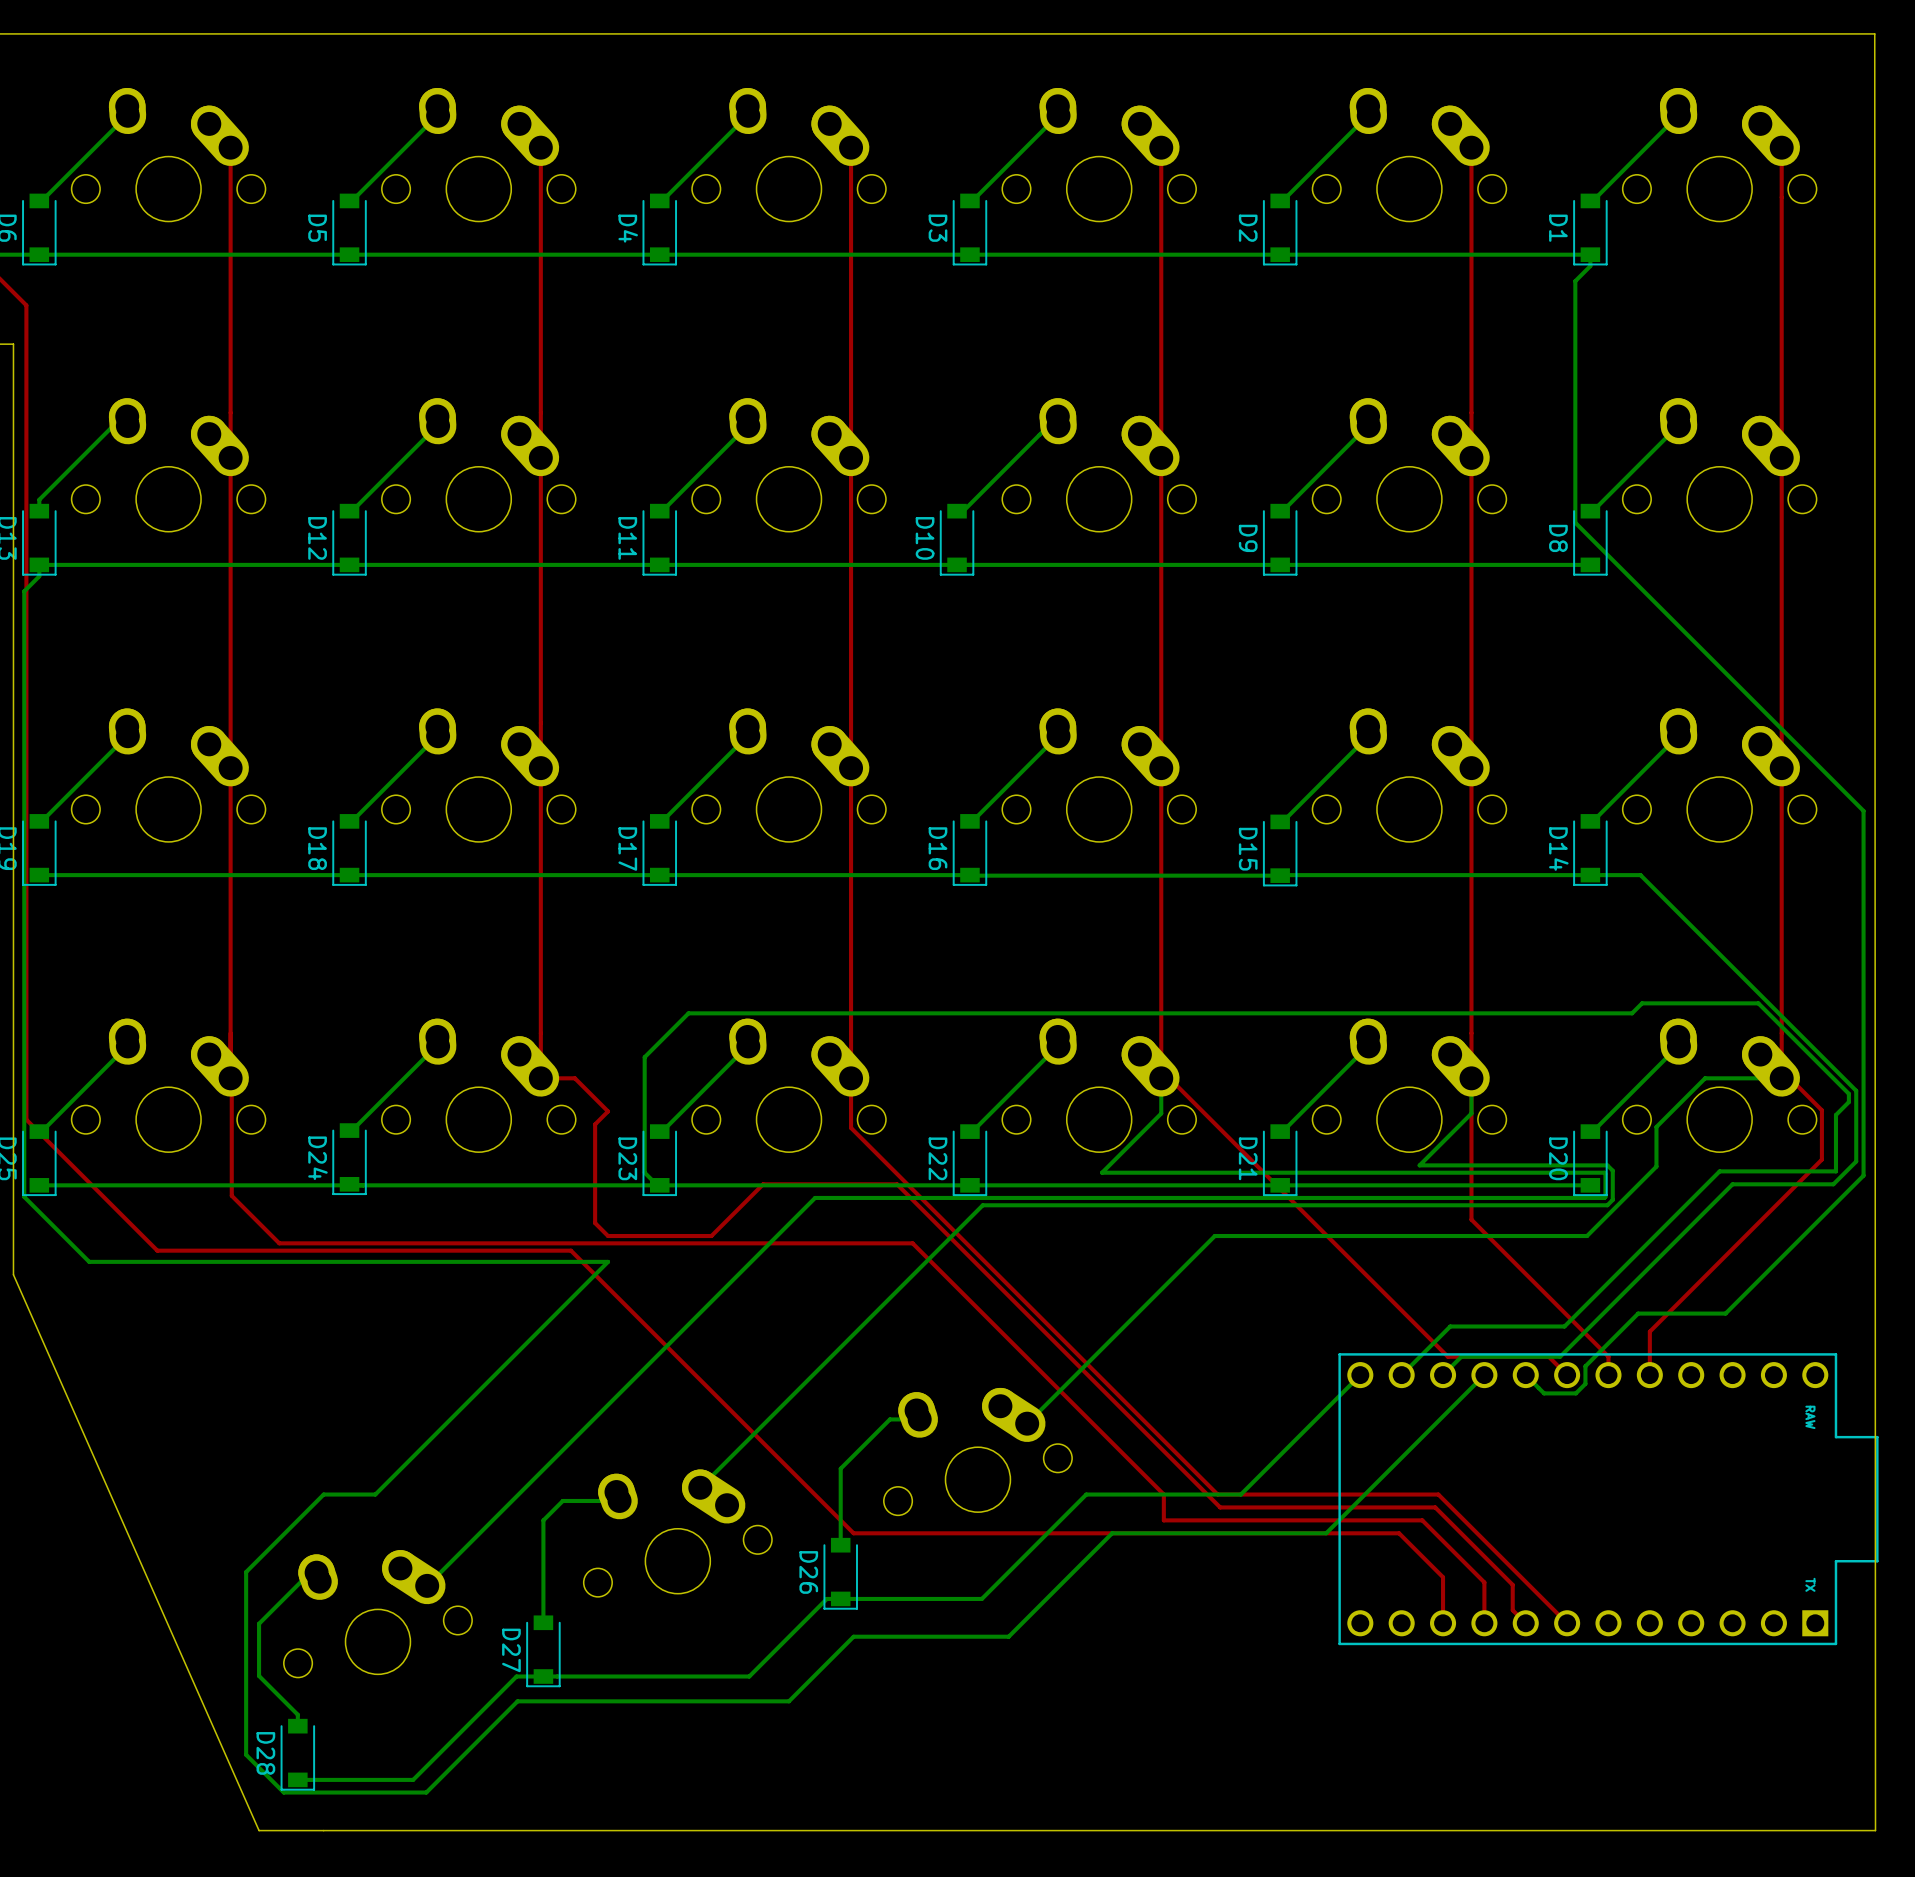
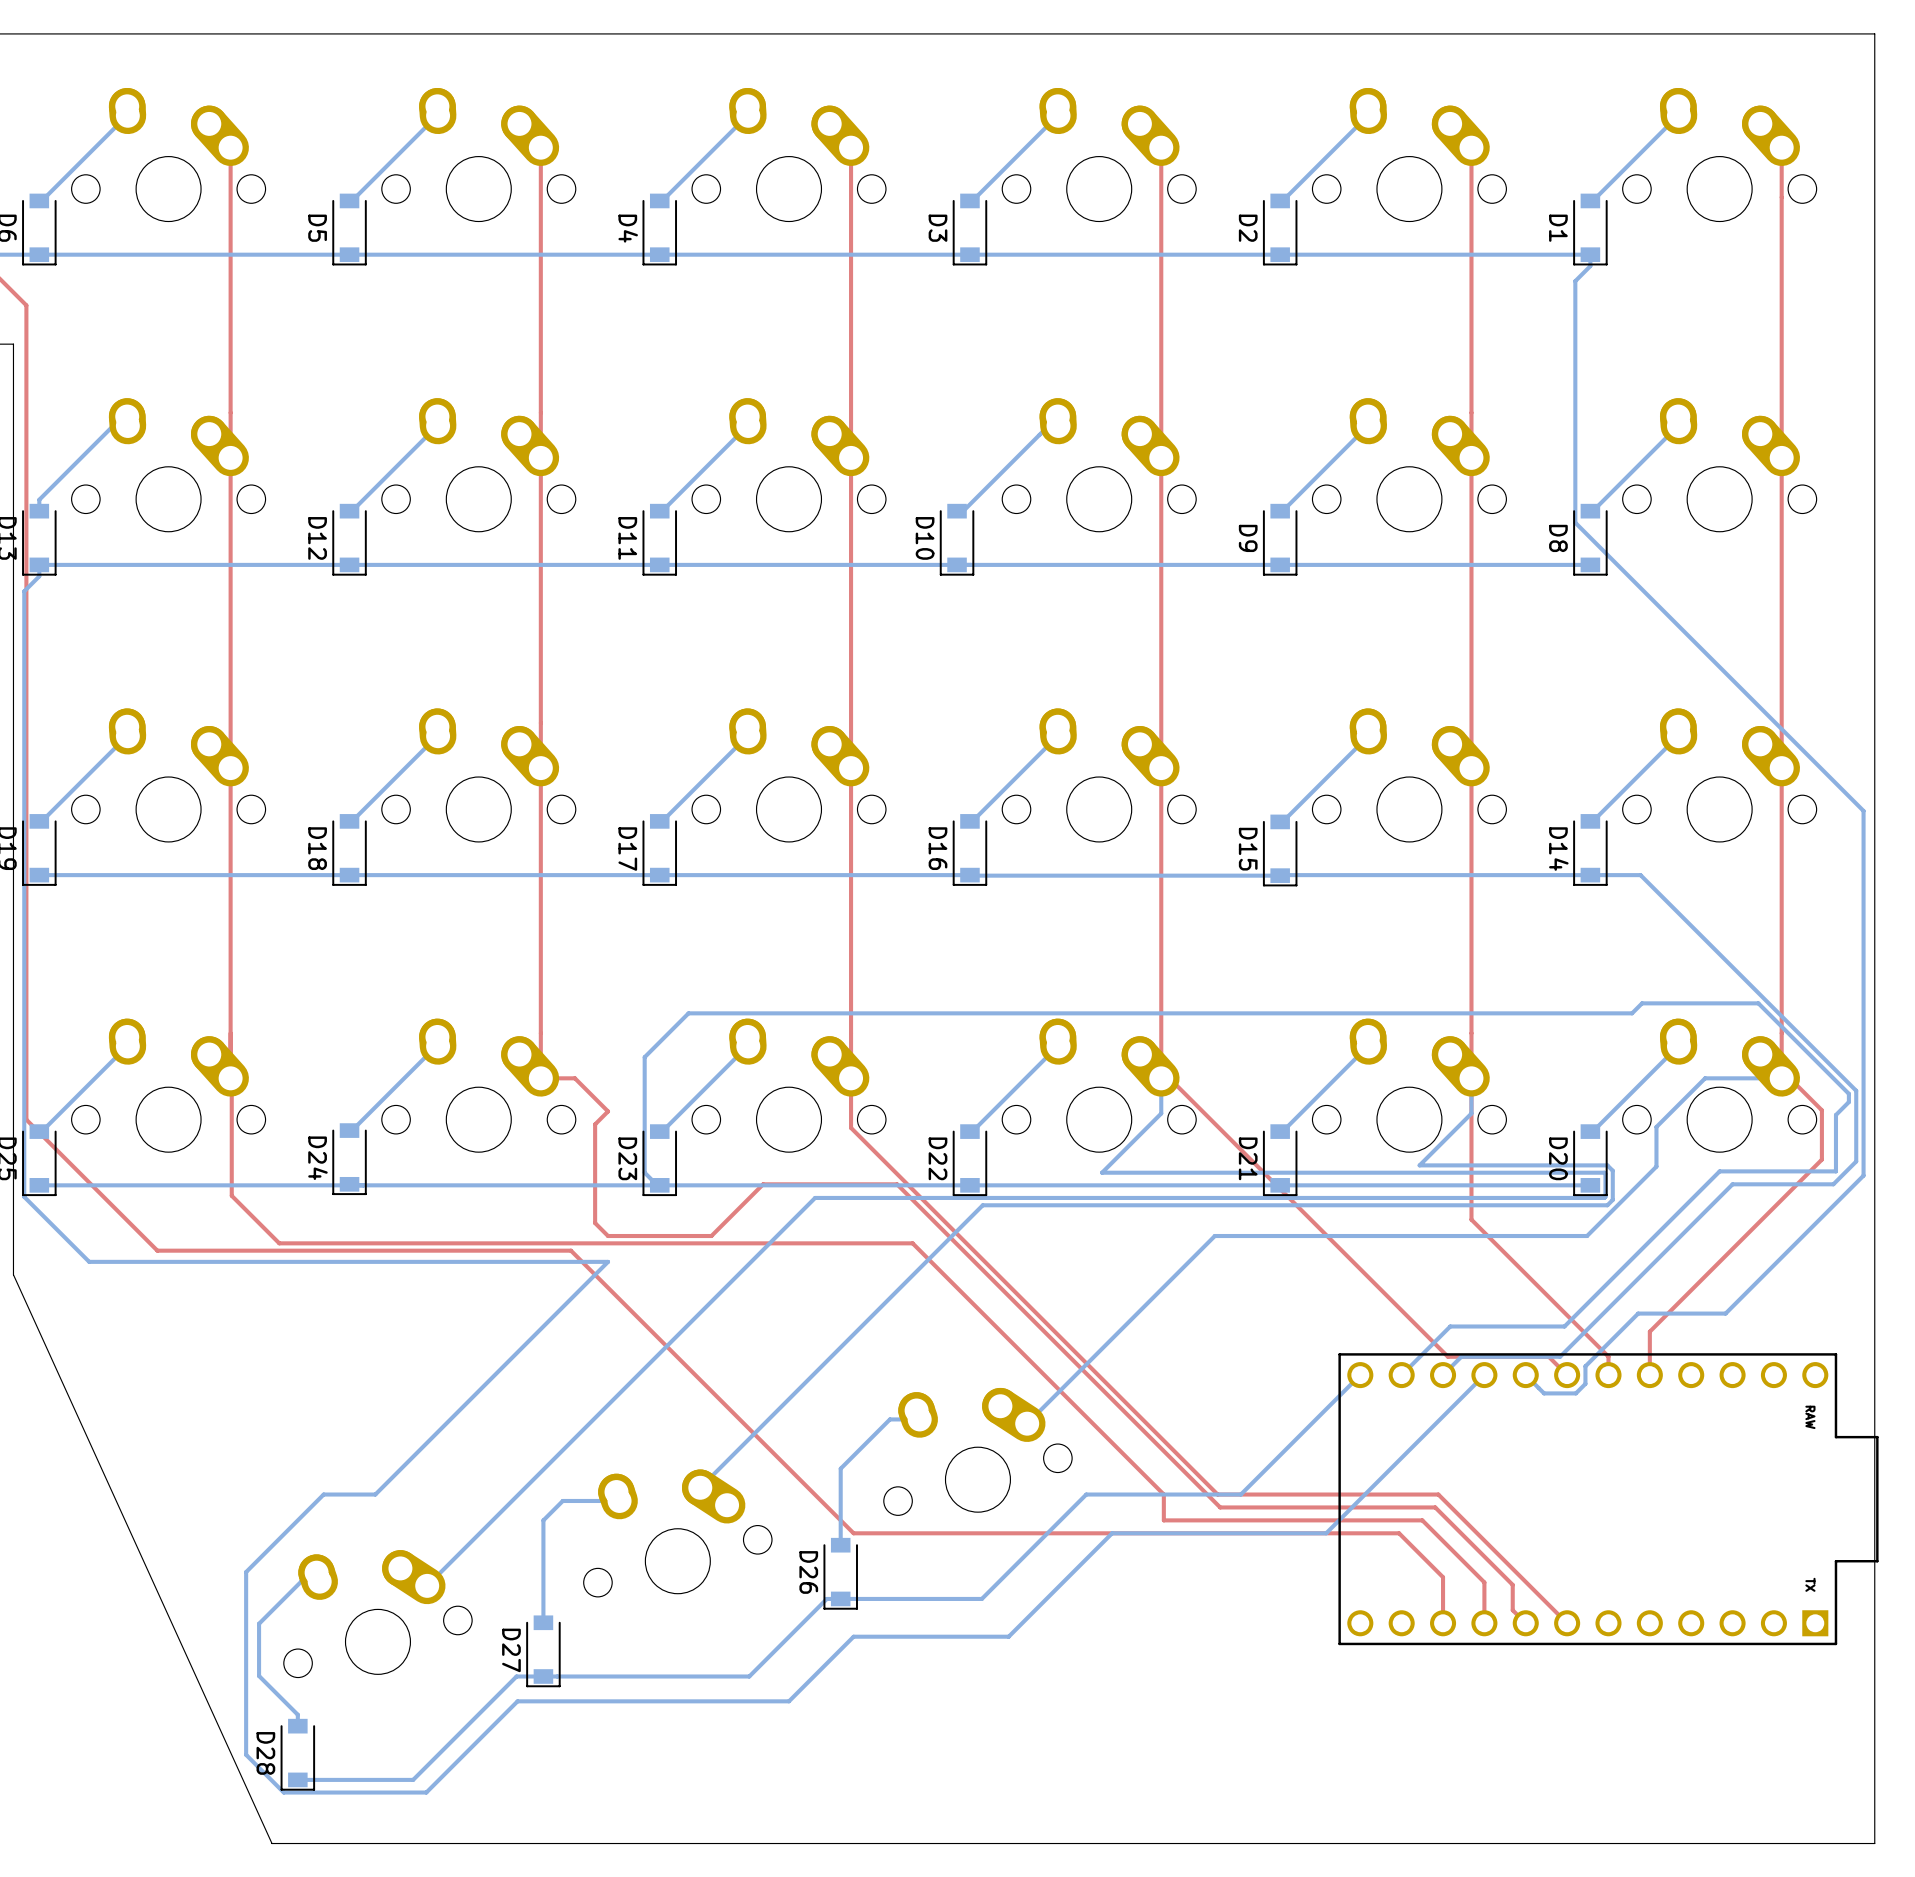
board edge: (1874, 33) (1875, 1830) (259, 1830) (13, 1274) -> (1874, 33) (1874, 1843) (271, 1843) (13, 1274)

